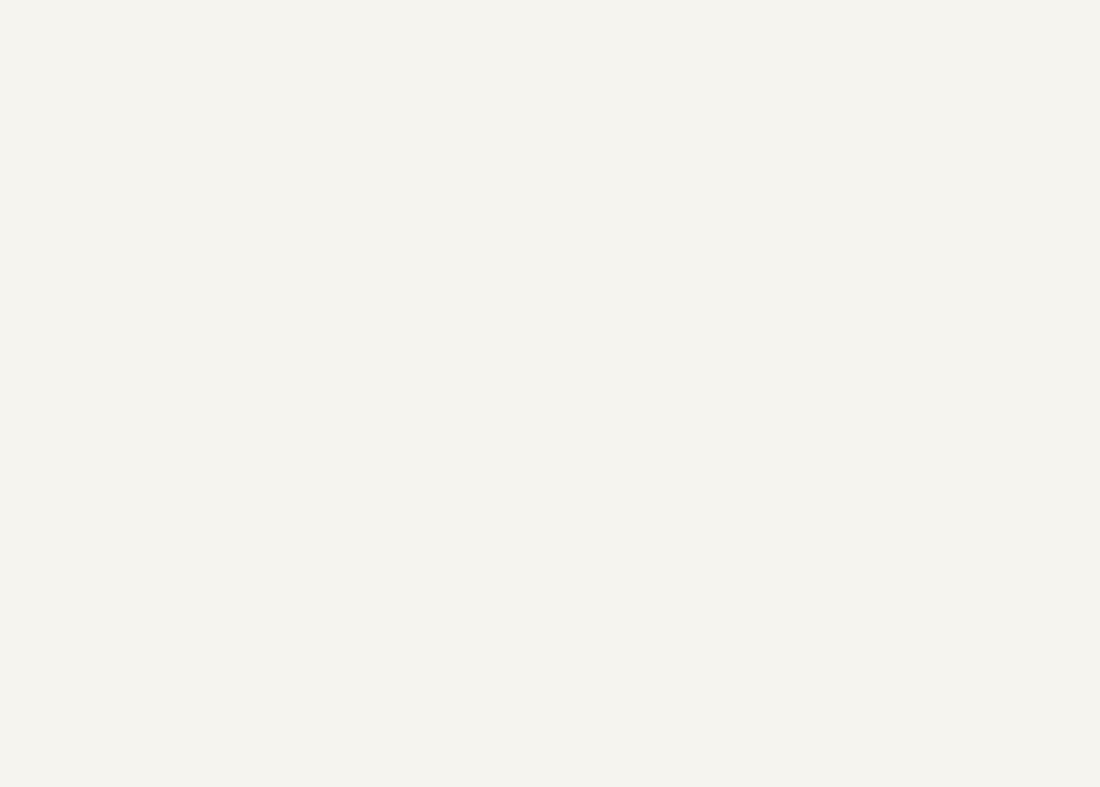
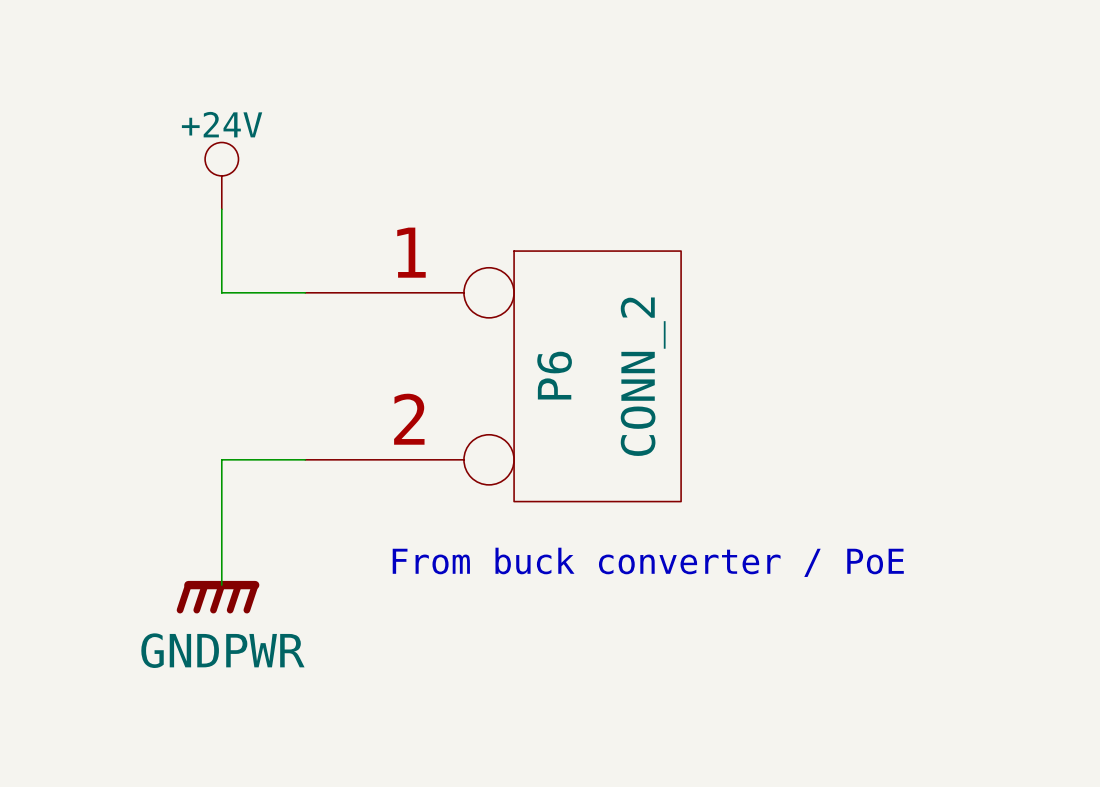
power symbol: none -> +24V (221, 175)
wire: none -> (221, 209) (221, 292) (305, 292)
P6: none -> CONN_2 (493, 376)
wire: none -> (305, 459) (221, 459) (221, 585)
text: none -> From buck converter / PoE (648, 562)
power symbol: none -> GNDPWR (218, 597)

